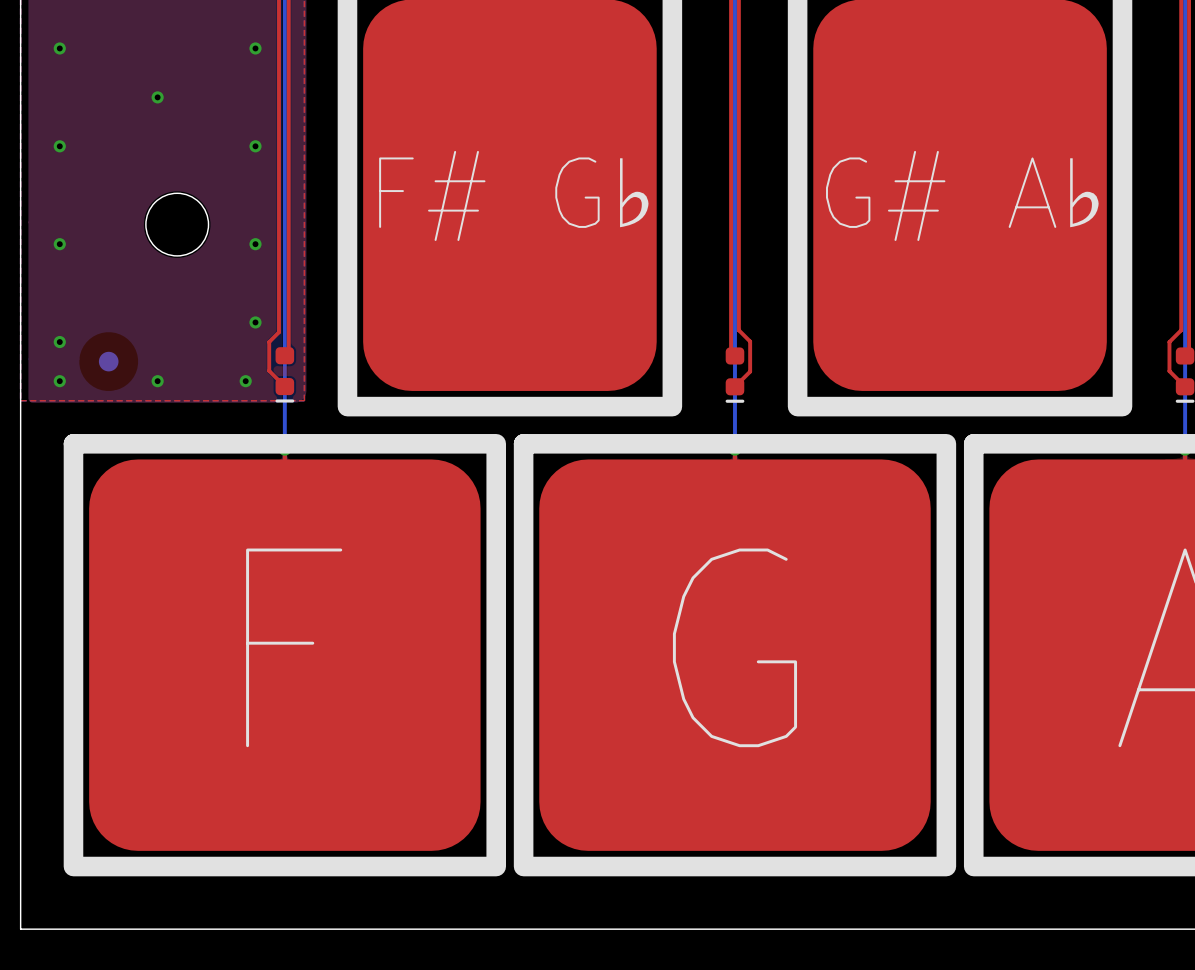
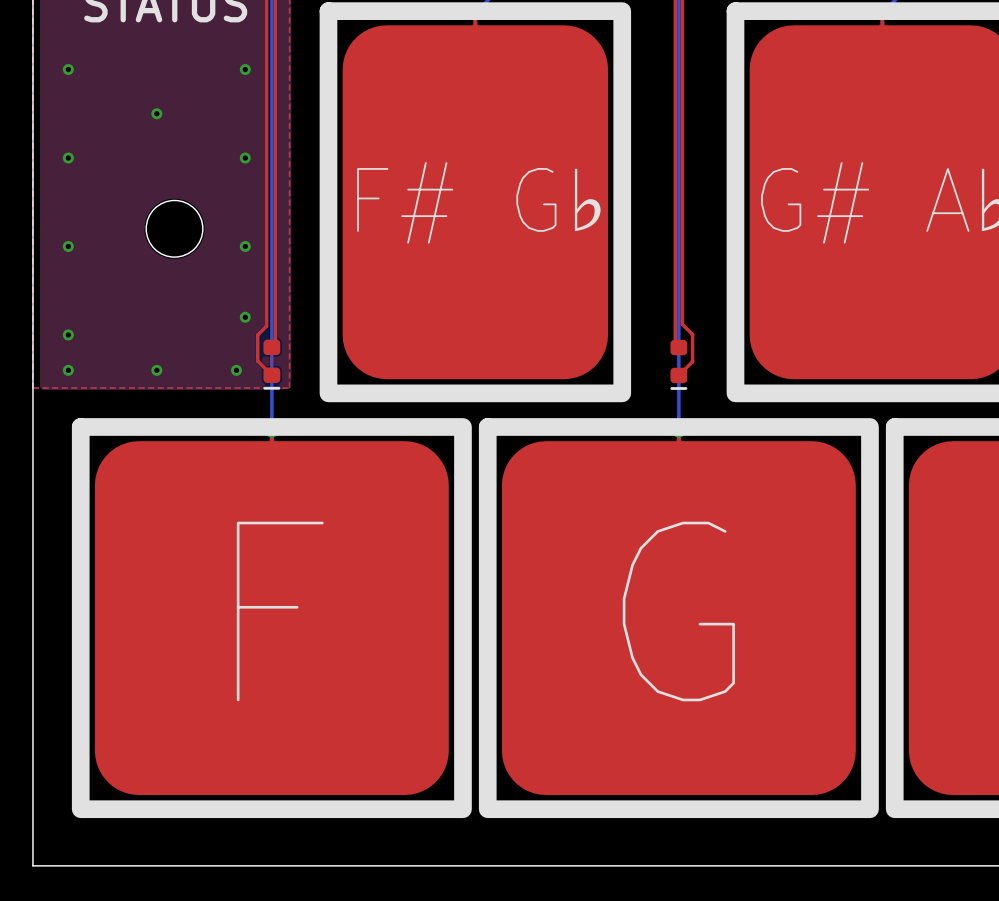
part: (108, 361) -> none

